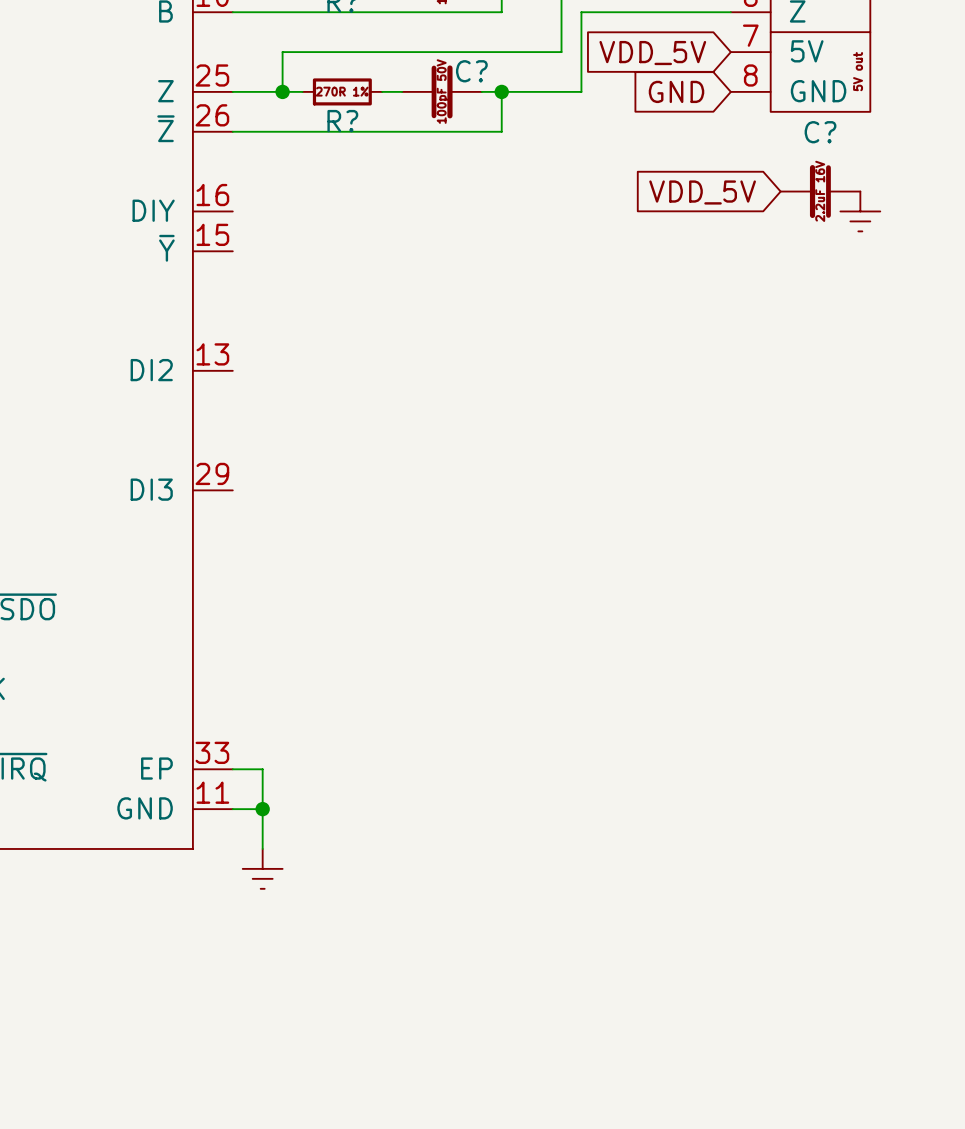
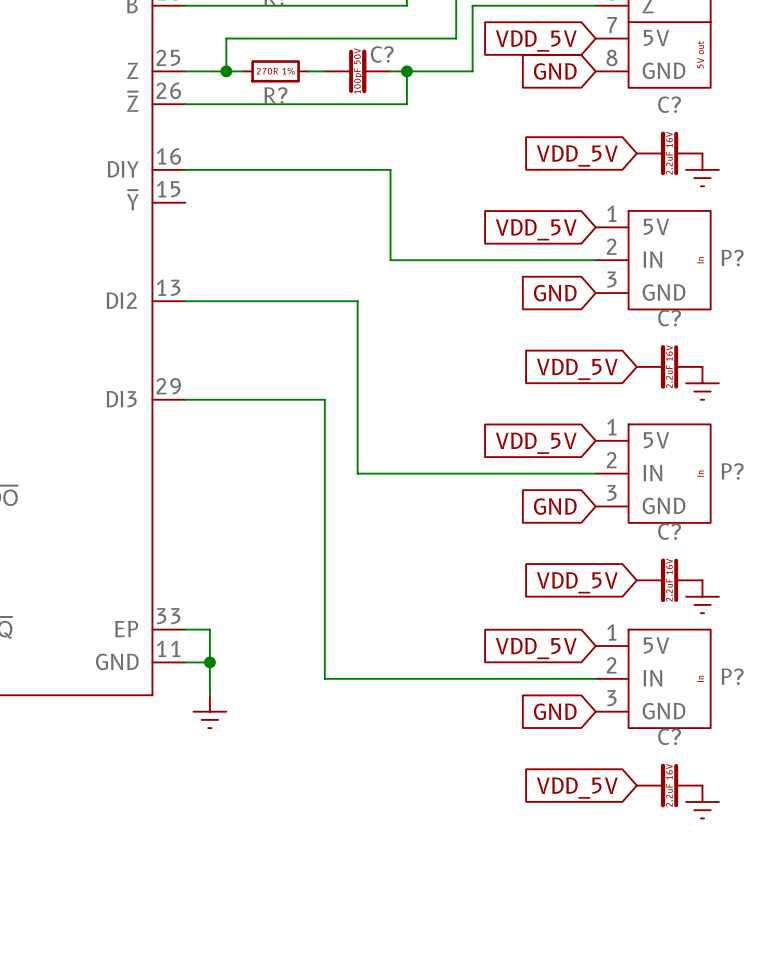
wire: none -> (185, 169) (390, 169) (390, 260) (595, 260)
global label: none -> VDD_5V (536, 229)
P?: none -> (653, 260)
global label: none -> GND (555, 293)
wire: none -> (185, 301) (357, 301) (357, 473) (595, 473)
C?: none -> (669, 366)
global label: none -> VDD_5V (577, 369)
power symbol: none -> (702, 383)
wire: none -> (185, 399) (324, 399) (324, 678) (595, 678)
global label: none -> VDD_5V (536, 443)
P?: none -> (653, 473)
global label: none -> GND (555, 506)
C?: none -> (669, 580)
global label: none -> VDD_5V (577, 582)
power symbol: none -> (702, 596)
global label: none -> VDD_5V (536, 648)
P?: none -> (653, 678)
global label: none -> GND (555, 711)
C?: none -> (669, 785)
global label: none -> VDD_5V (577, 788)
power symbol: none -> (702, 802)

